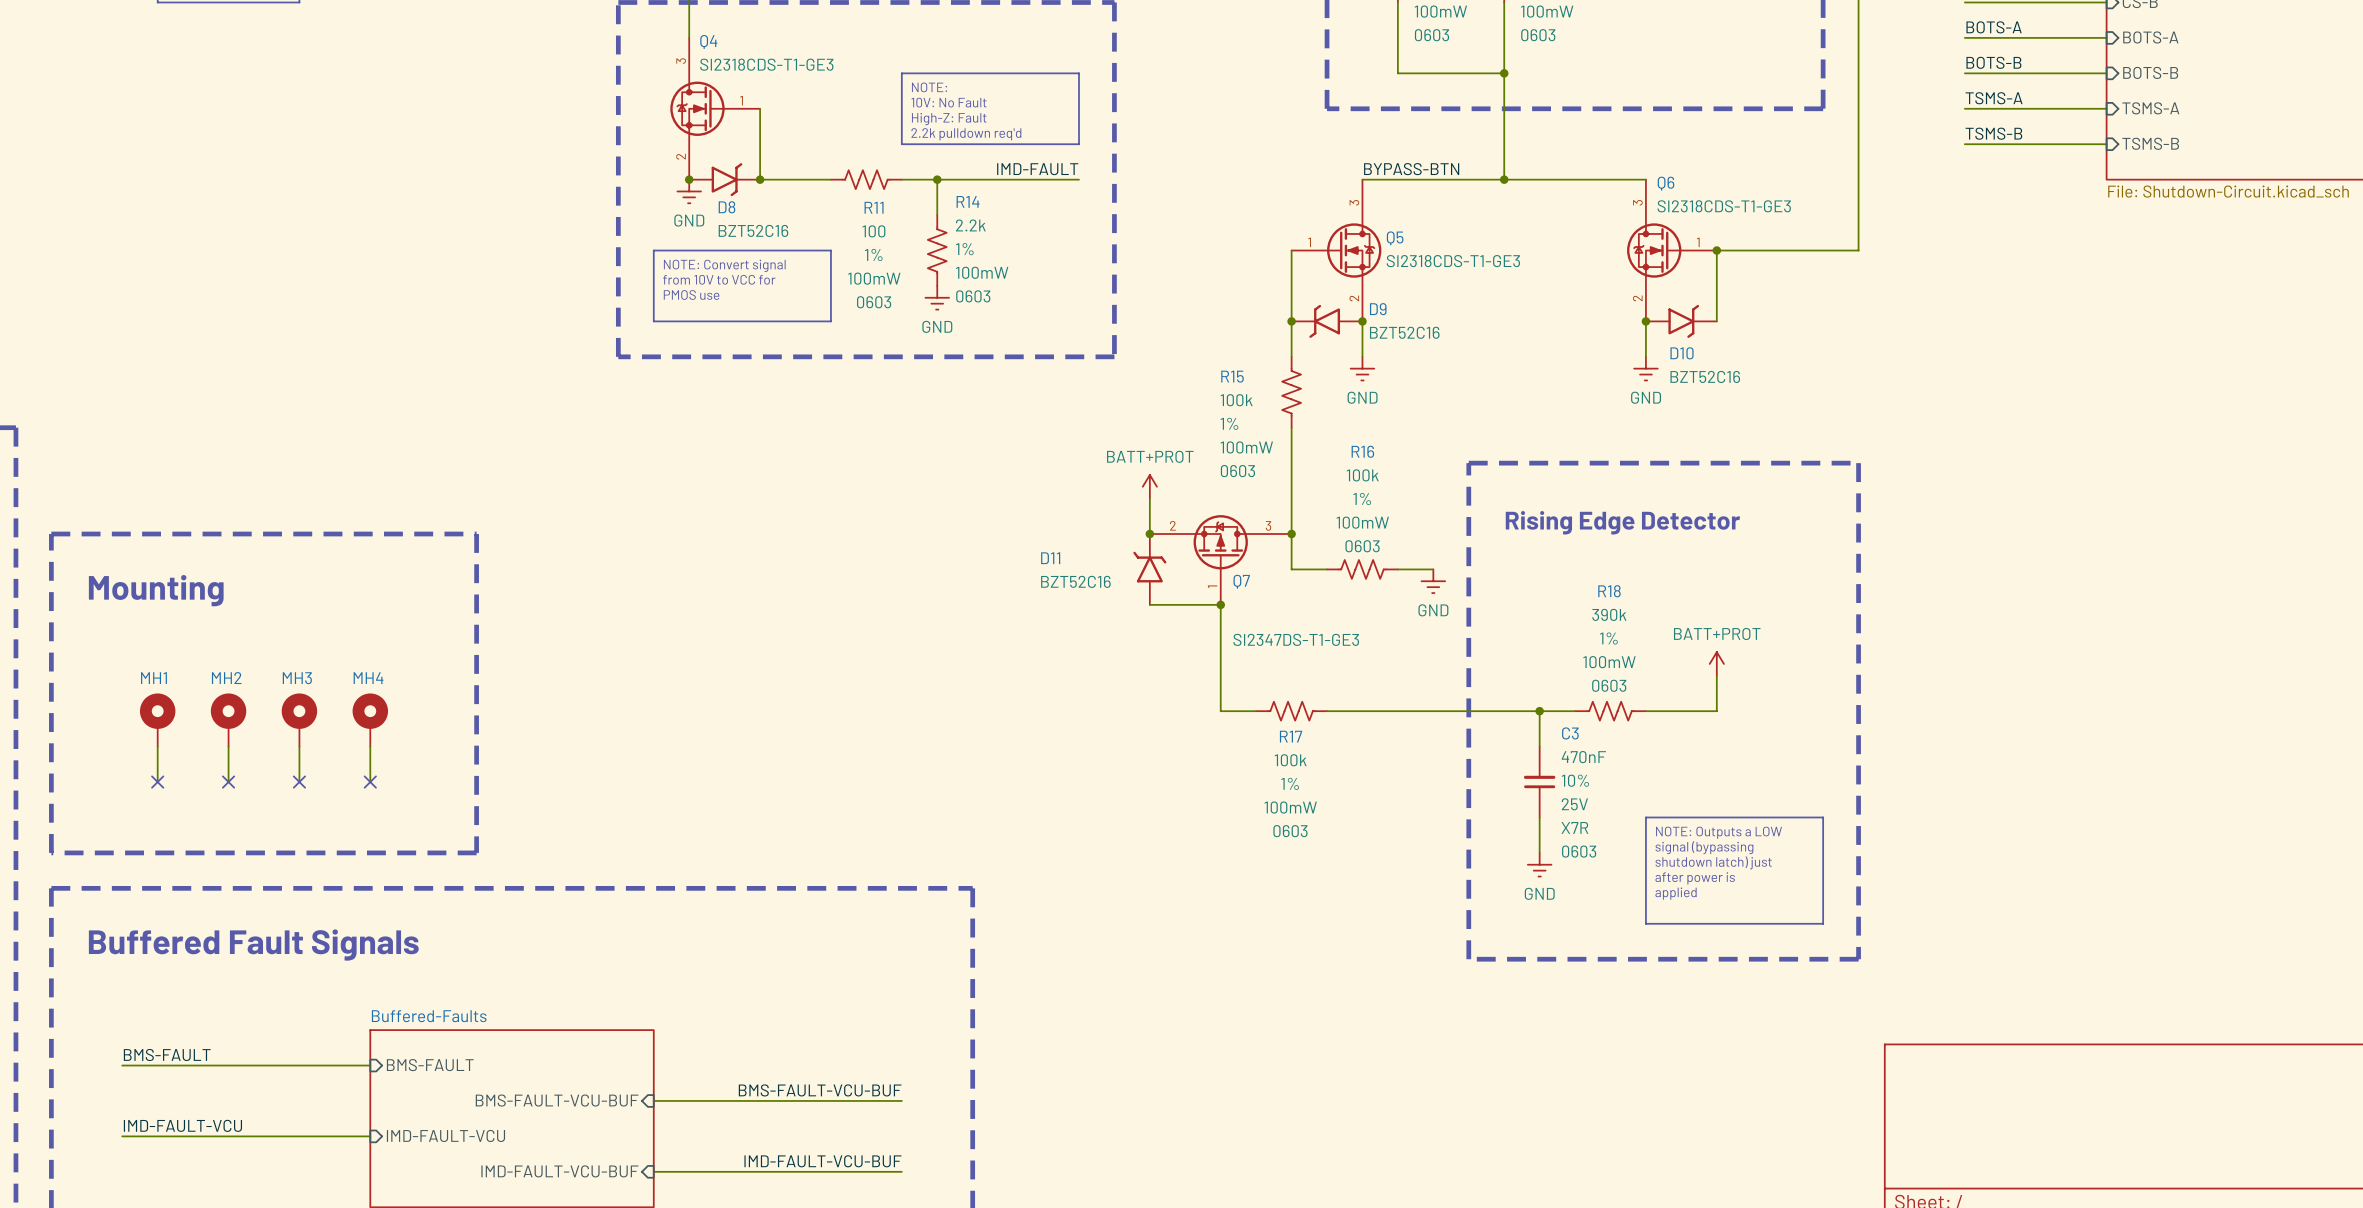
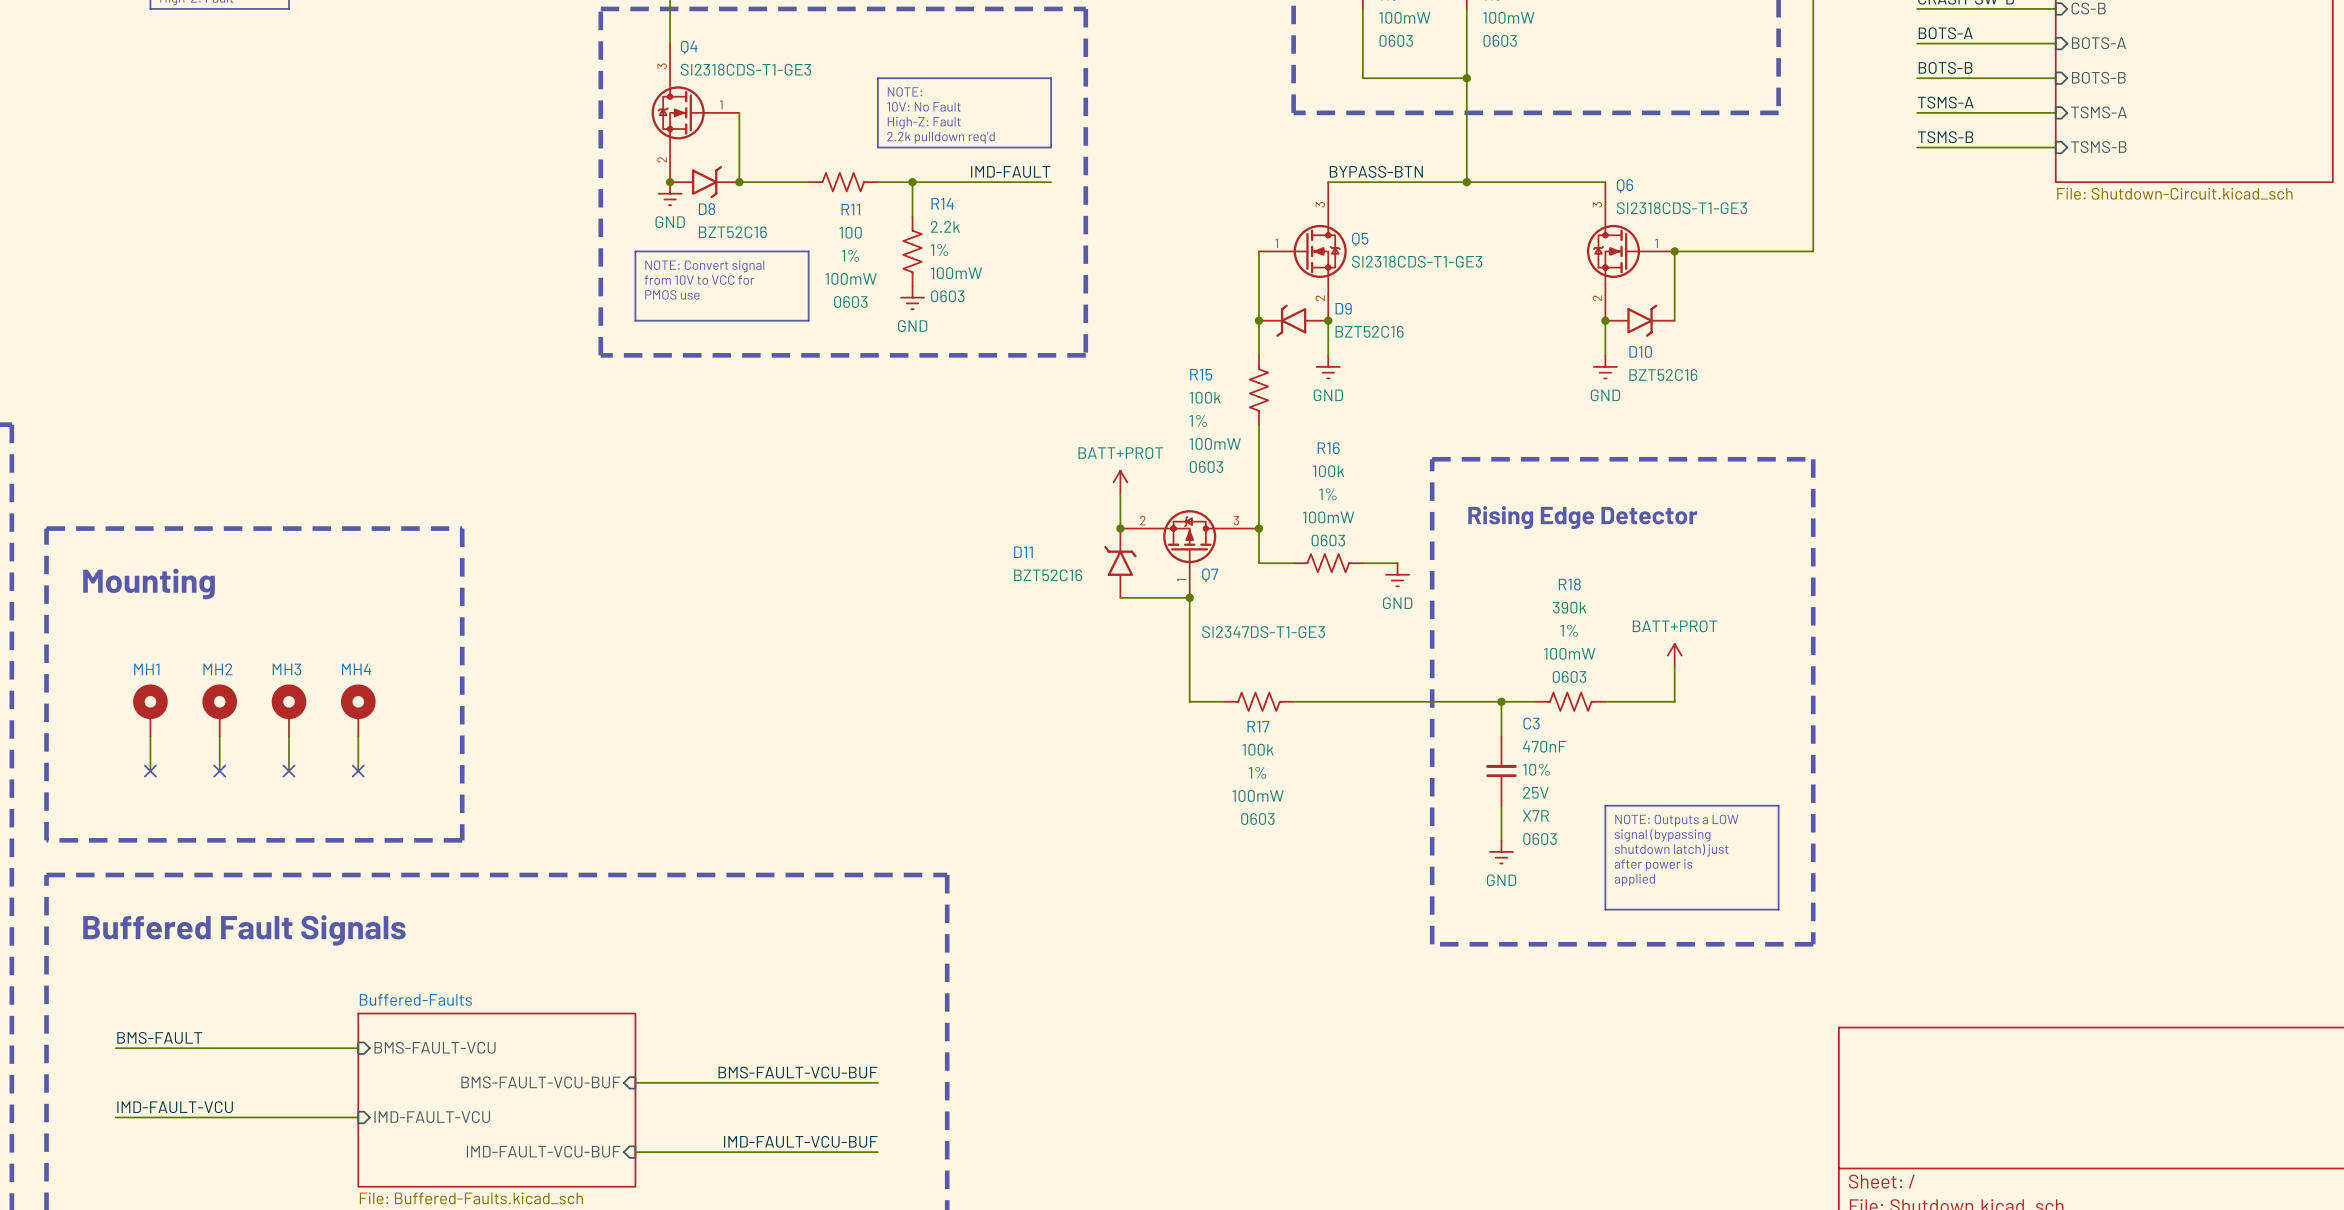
sheet pin: BMS-FAULT (430, 1065) -> BMS-FAULT-VCU (435, 1047)

